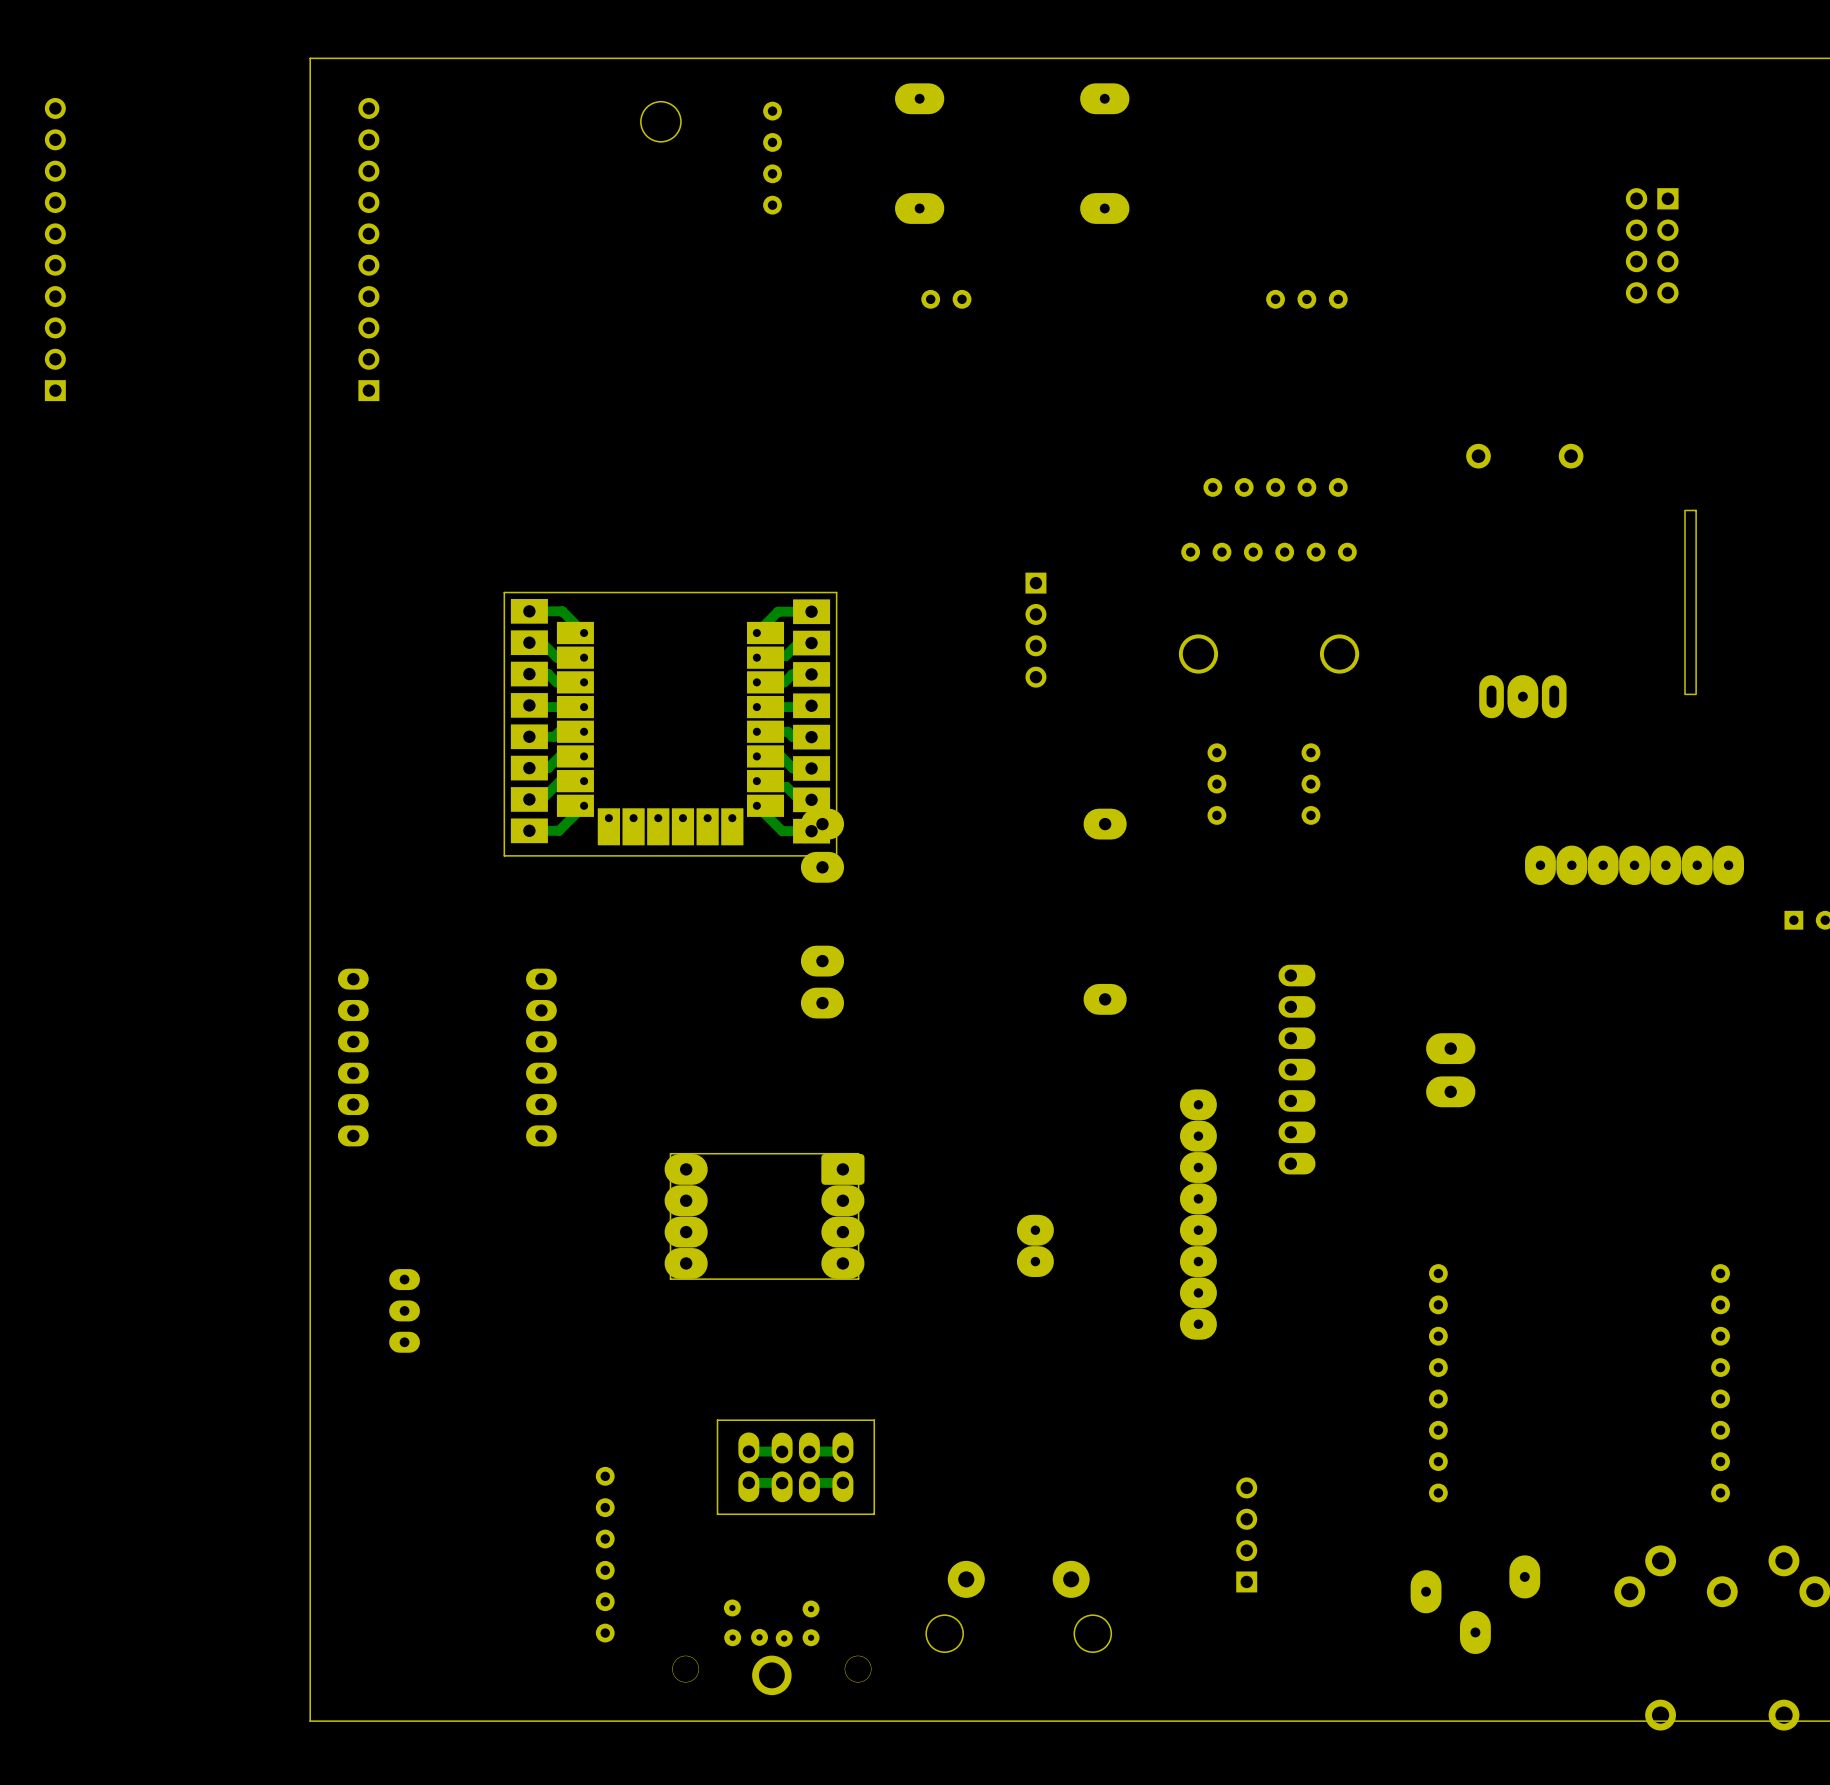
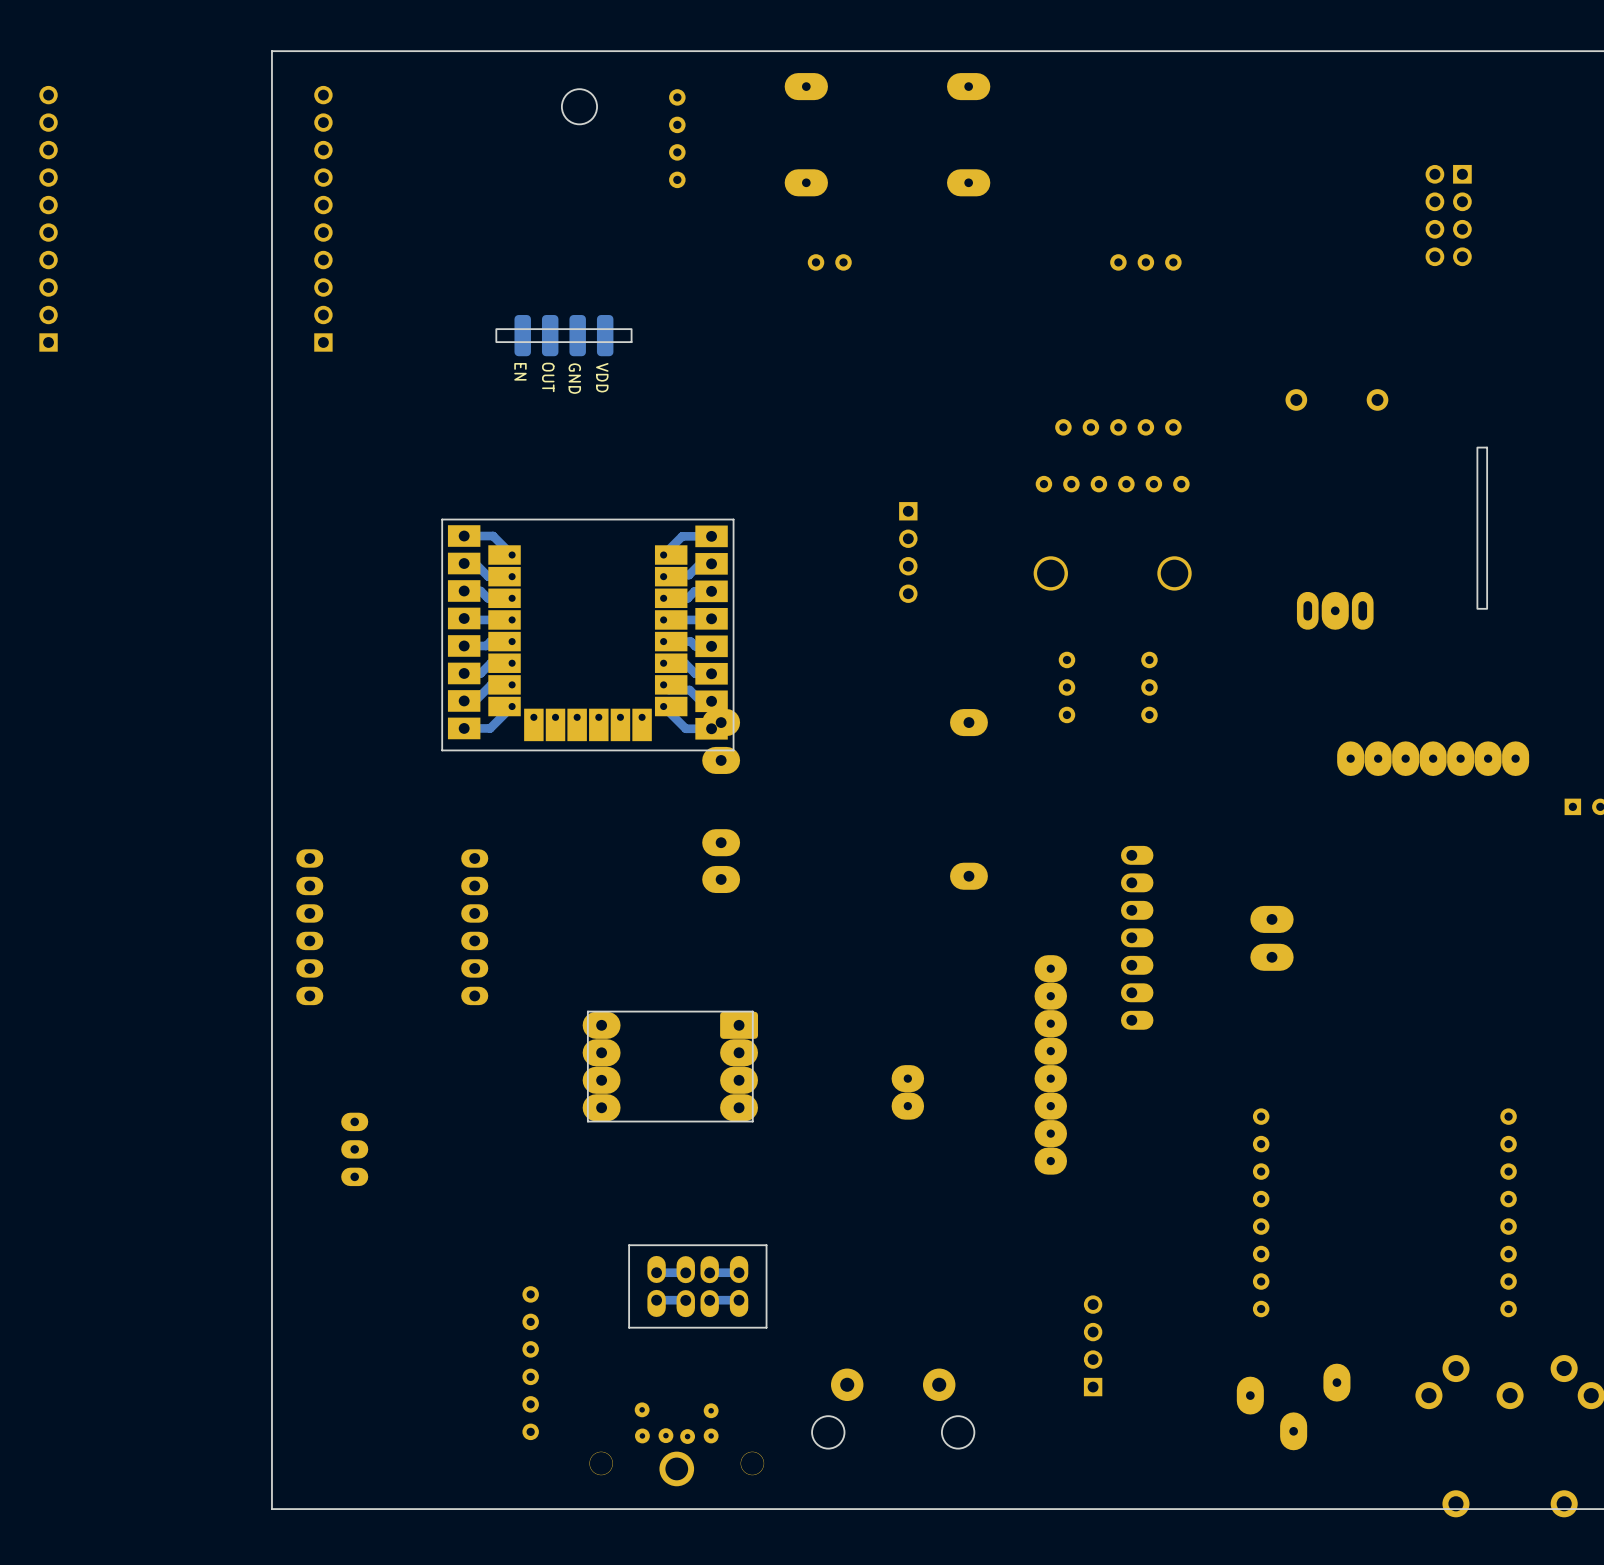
part: none -> (563, 335)

